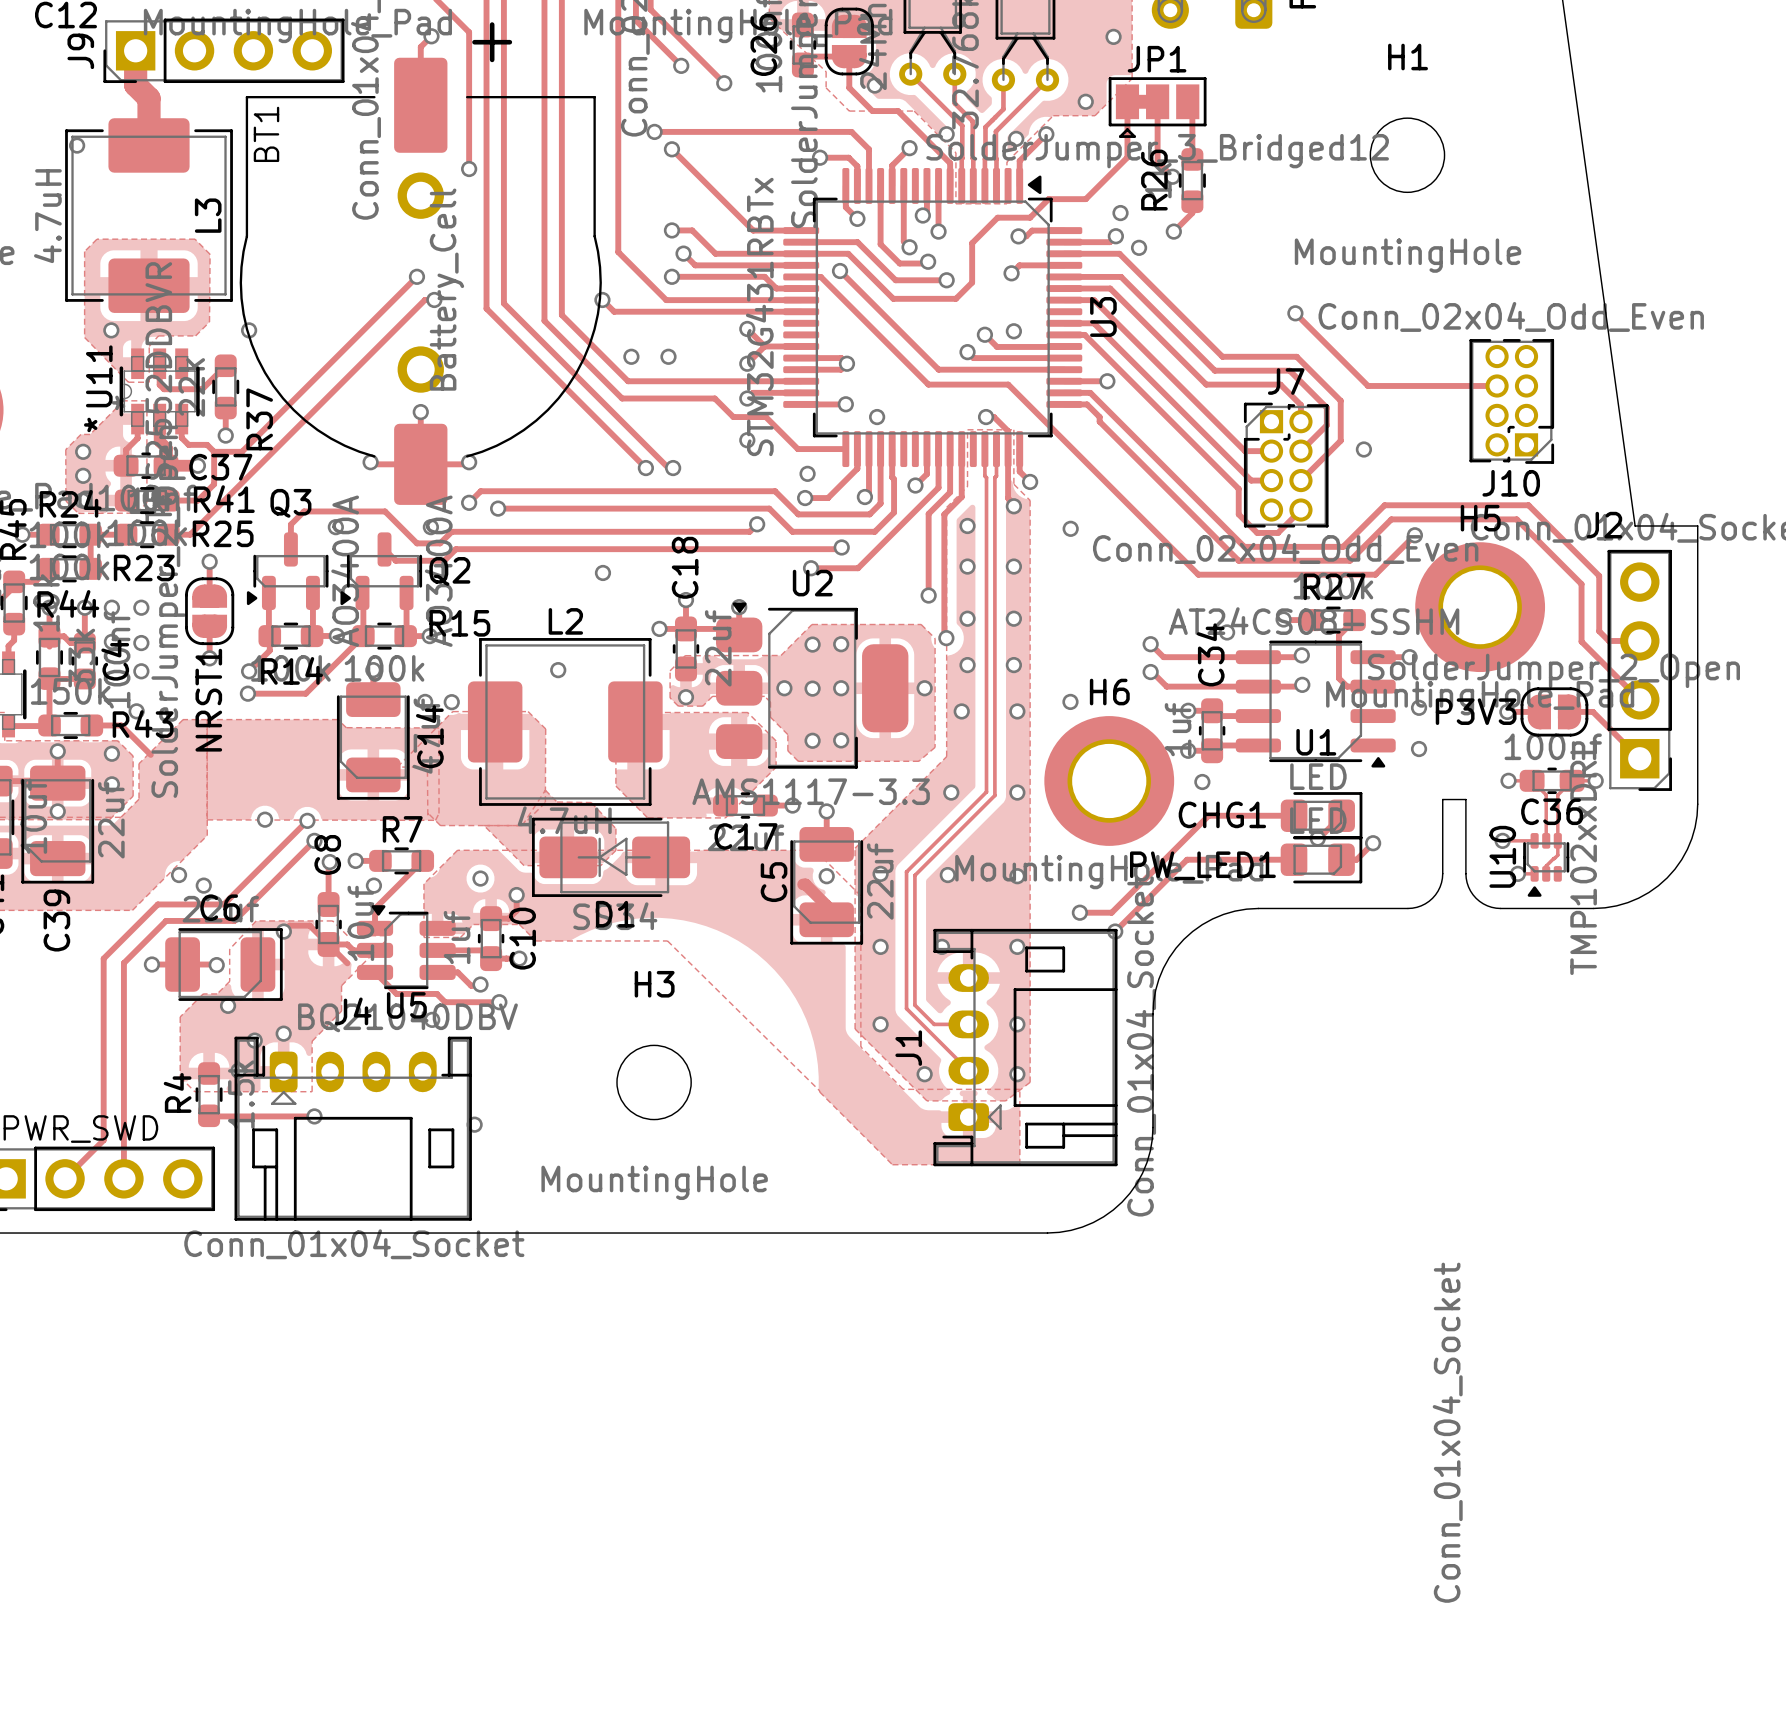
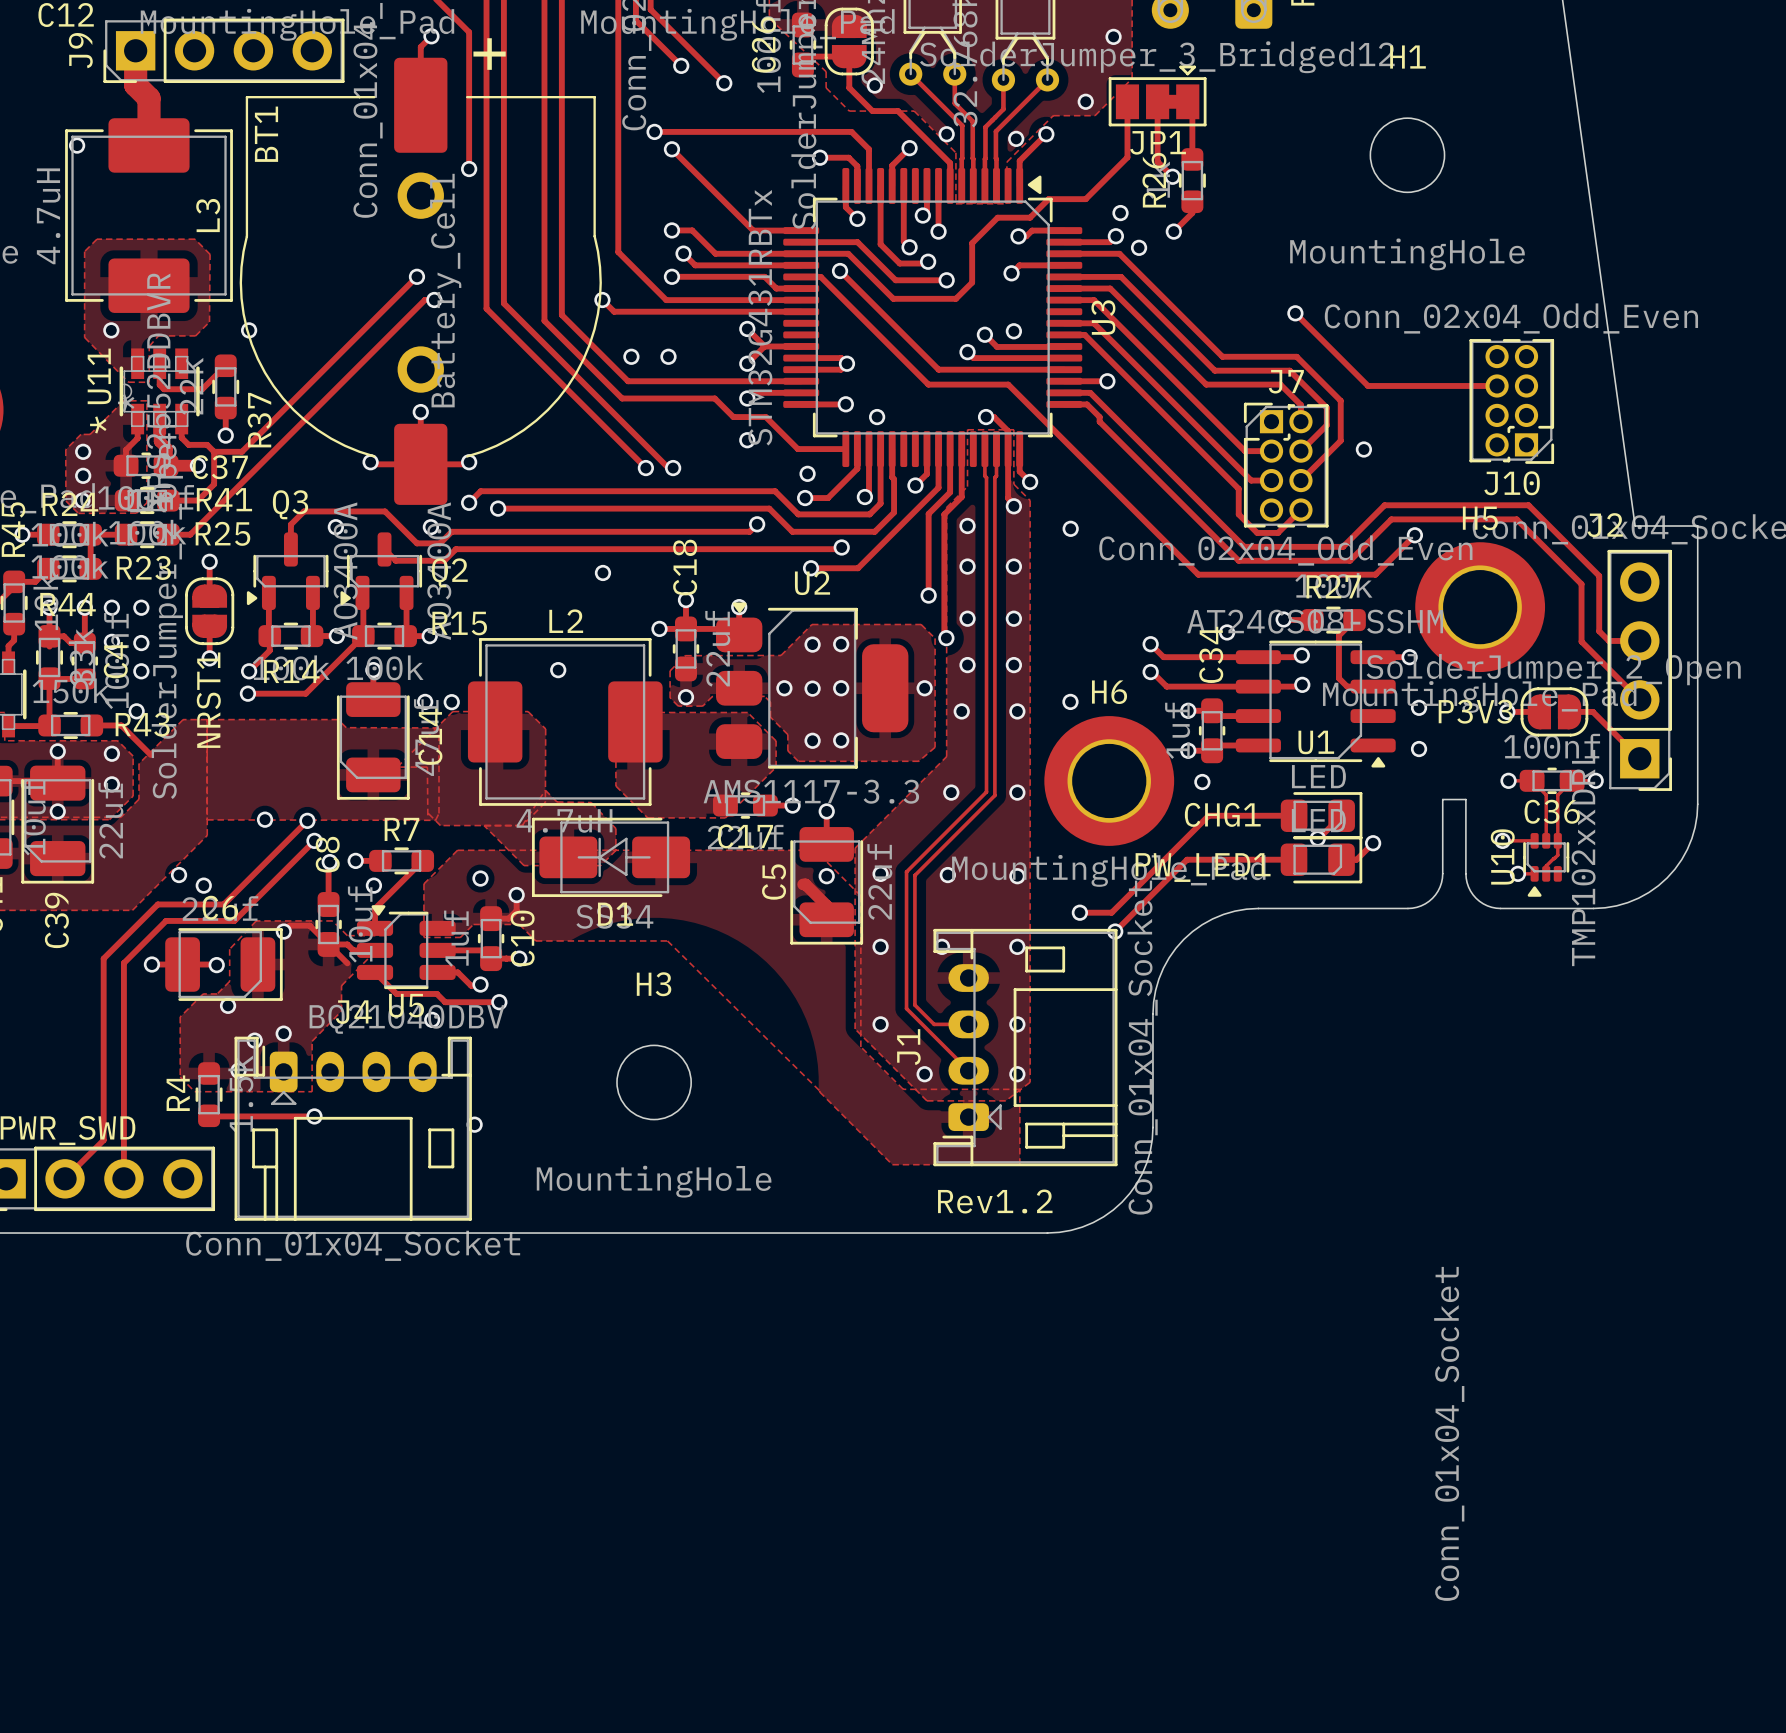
JP1 rotation: 0° (1157, 107) -> 180° (1157, 95)
text: none -> Rev1.2 (995, 1201)

